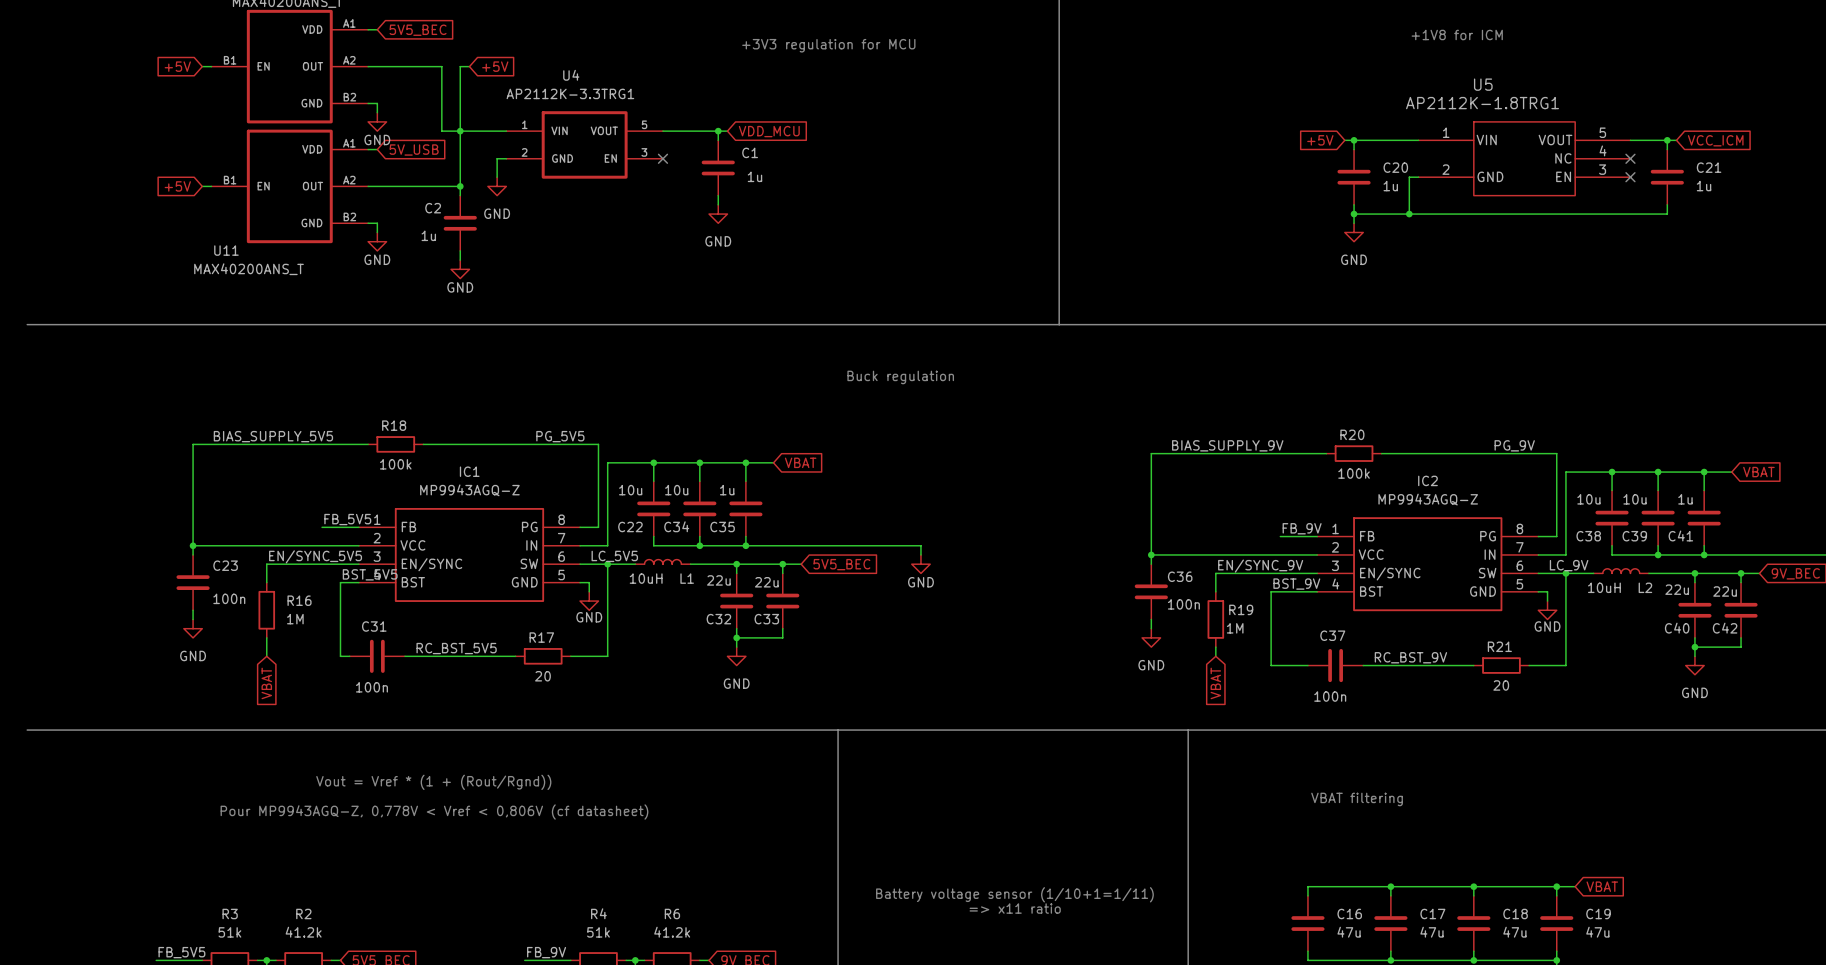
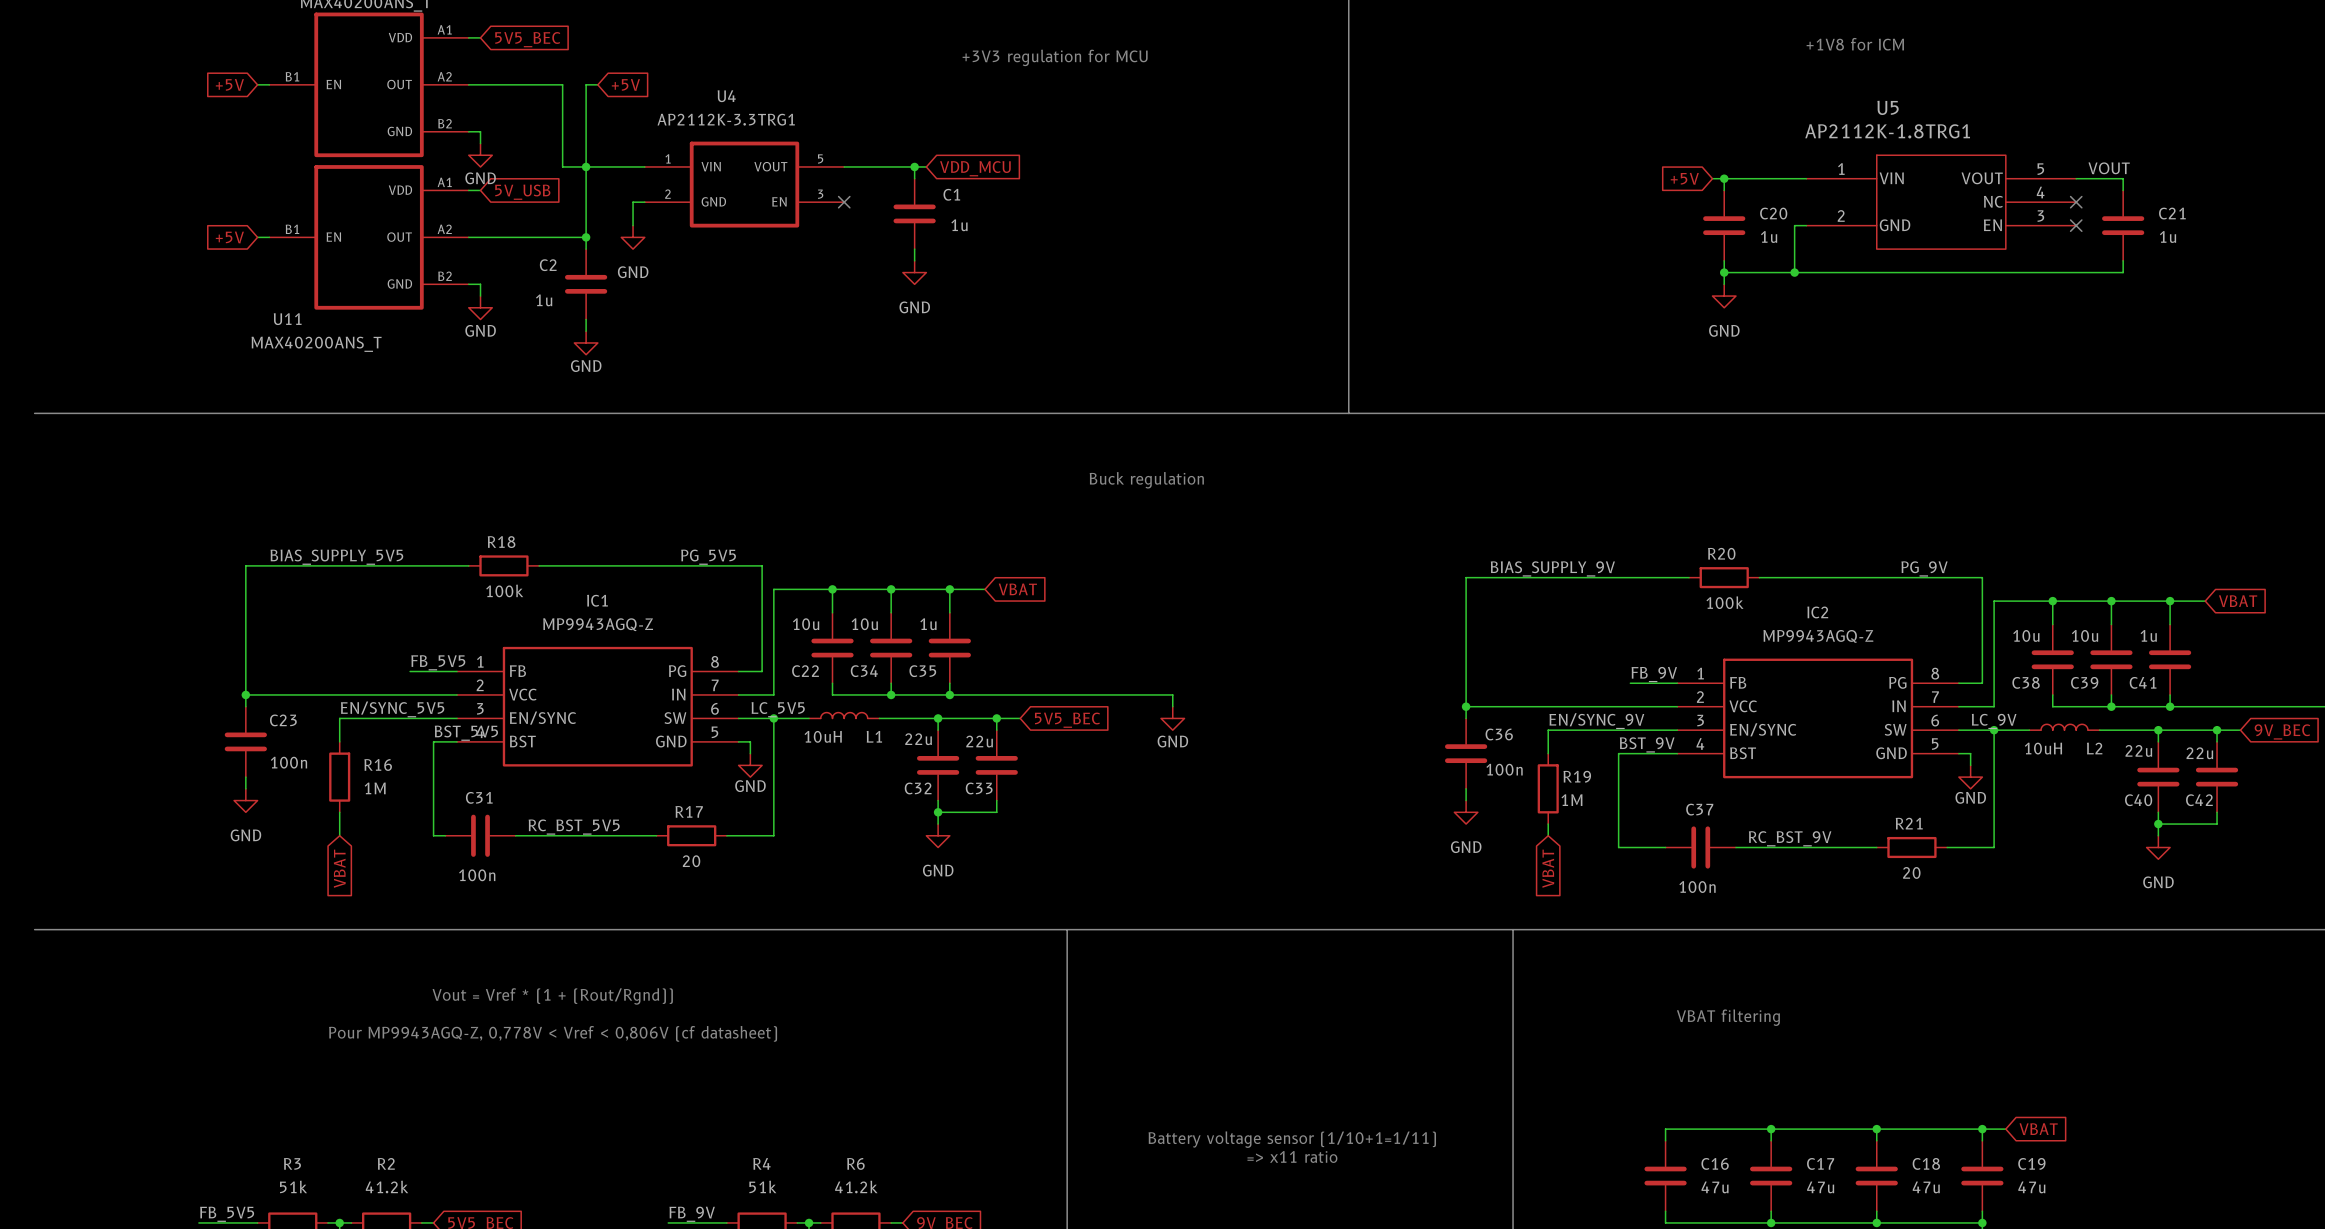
label: none -> VOUT (2109, 168)
wire: (1667, 140) (1676, 140) -> none
junction: (1667, 140) -> none
global label: VCC_ICM (1715, 140) -> none

